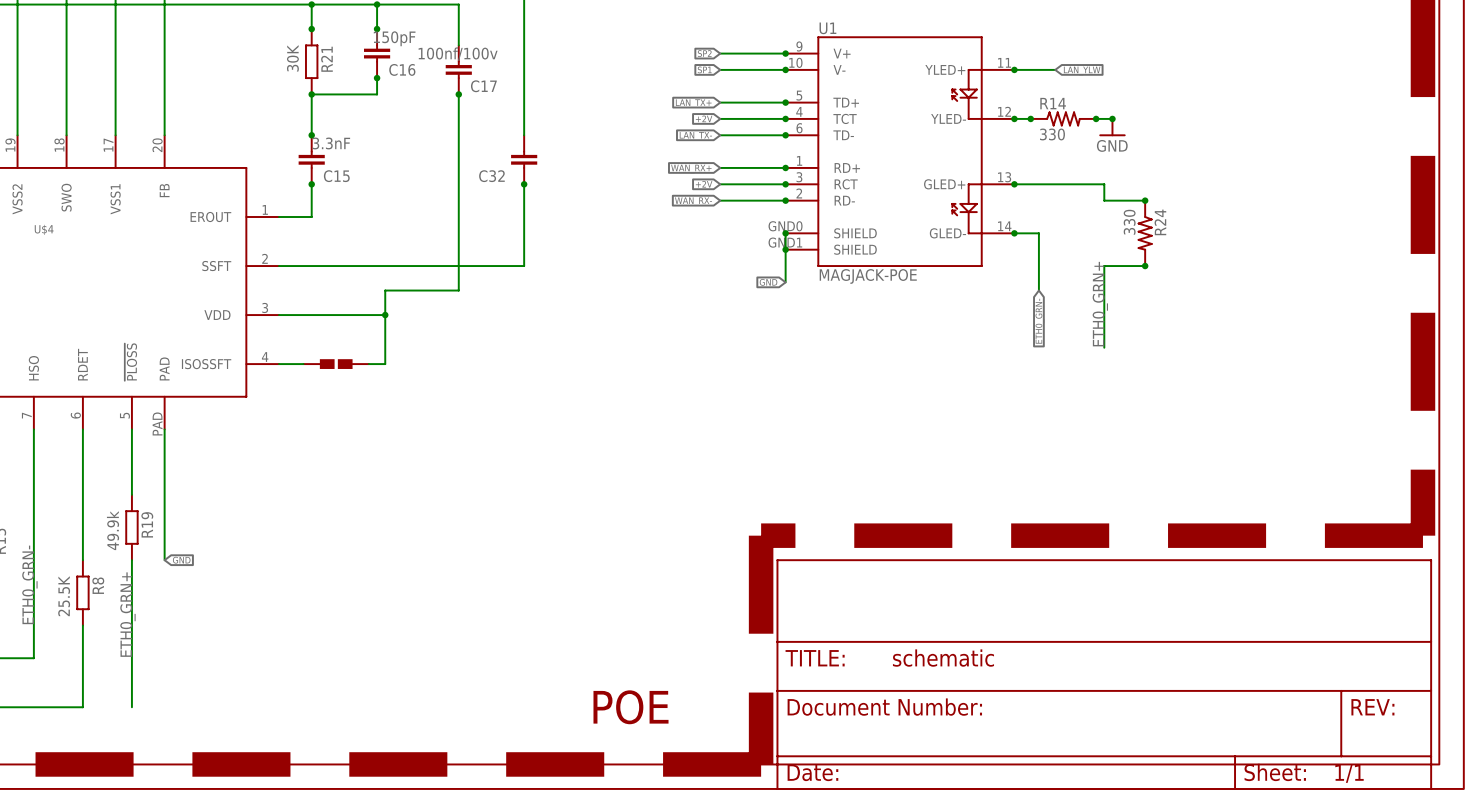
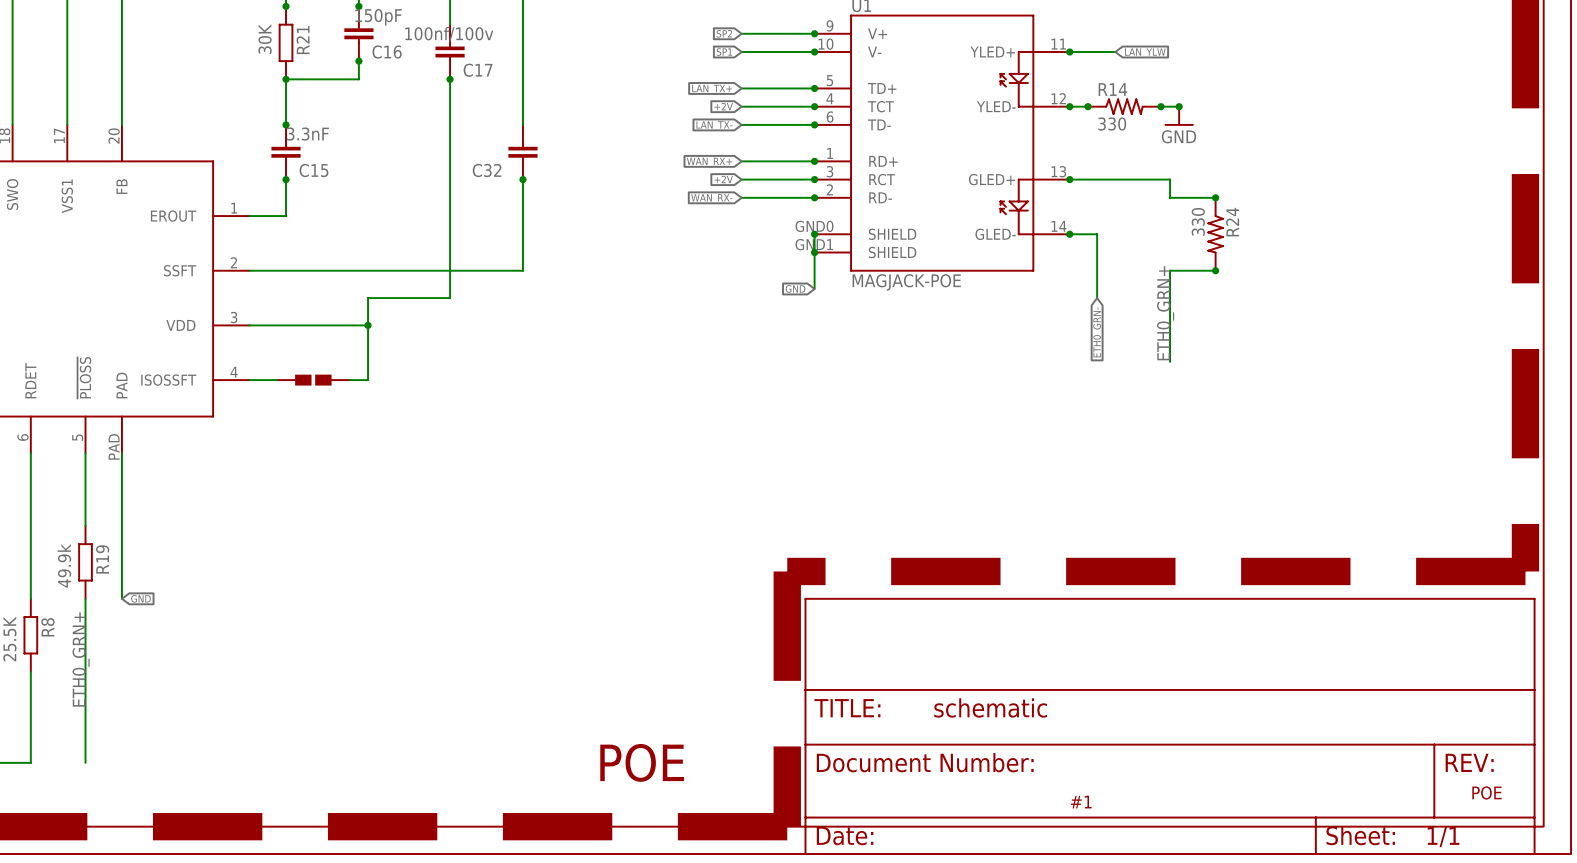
text: none -> POE (1486, 792)
text: none -> #1 (1081, 802)

